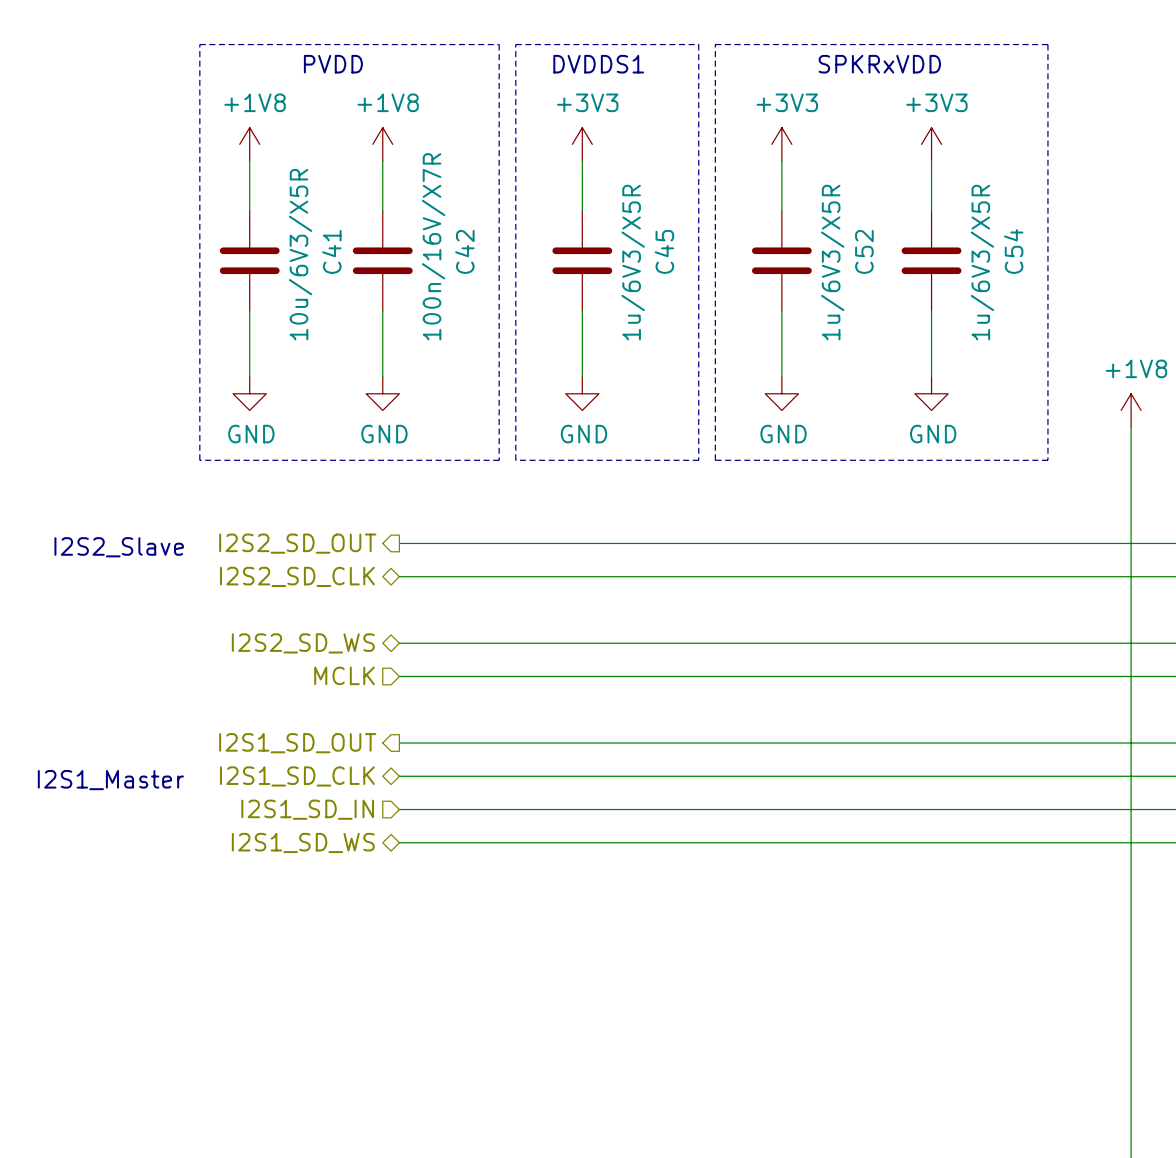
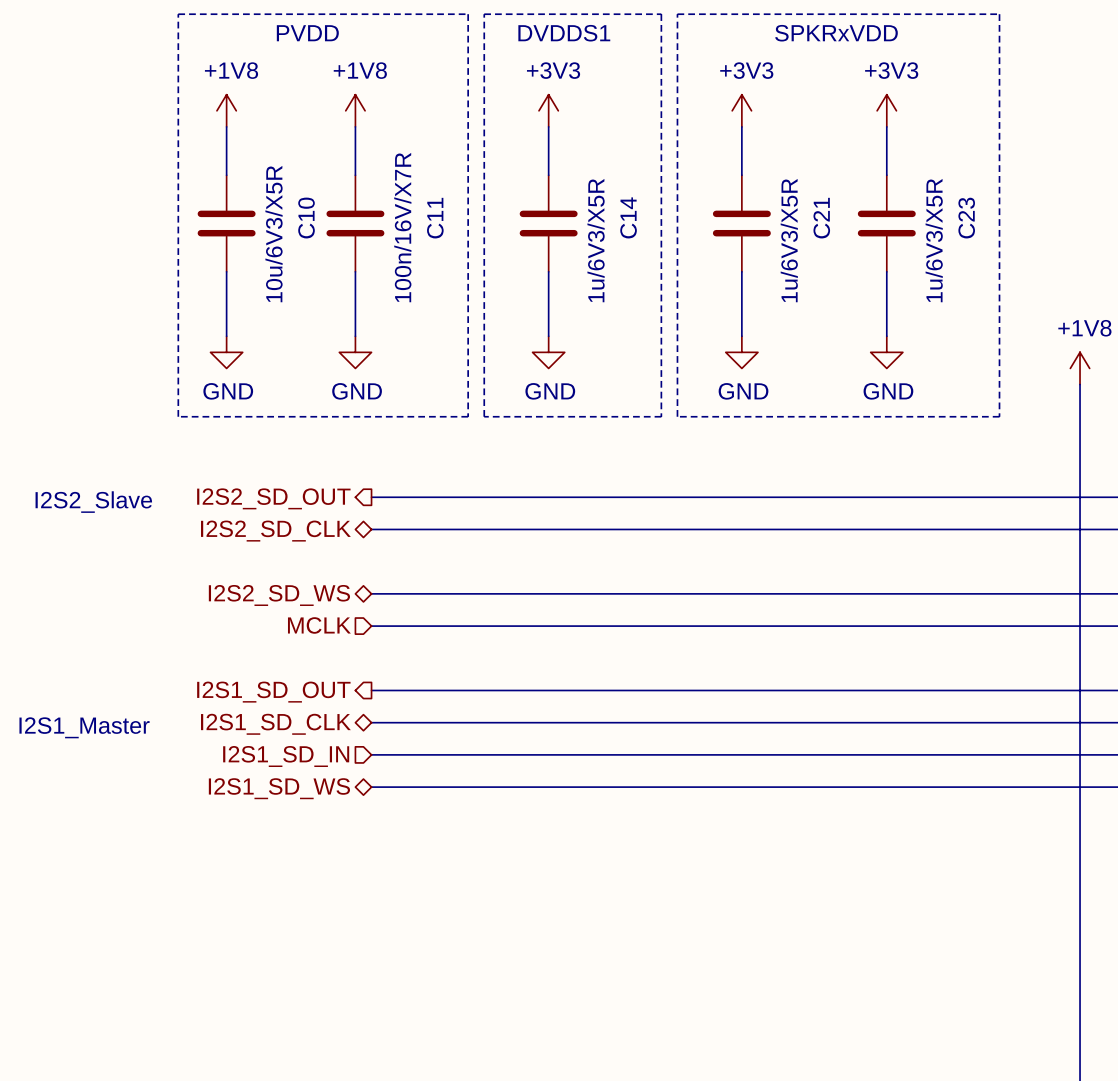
C41 name: C41 (331, 251) -> C10 (306, 218)
C42 name: C42 (464, 251) -> C11 (435, 218)
C45 name: C45 (664, 251) -> C14 (628, 217)
C52 name: C52 (864, 251) -> C21 (821, 218)
C54 name: C54 (1013, 251) -> C23 (966, 218)

